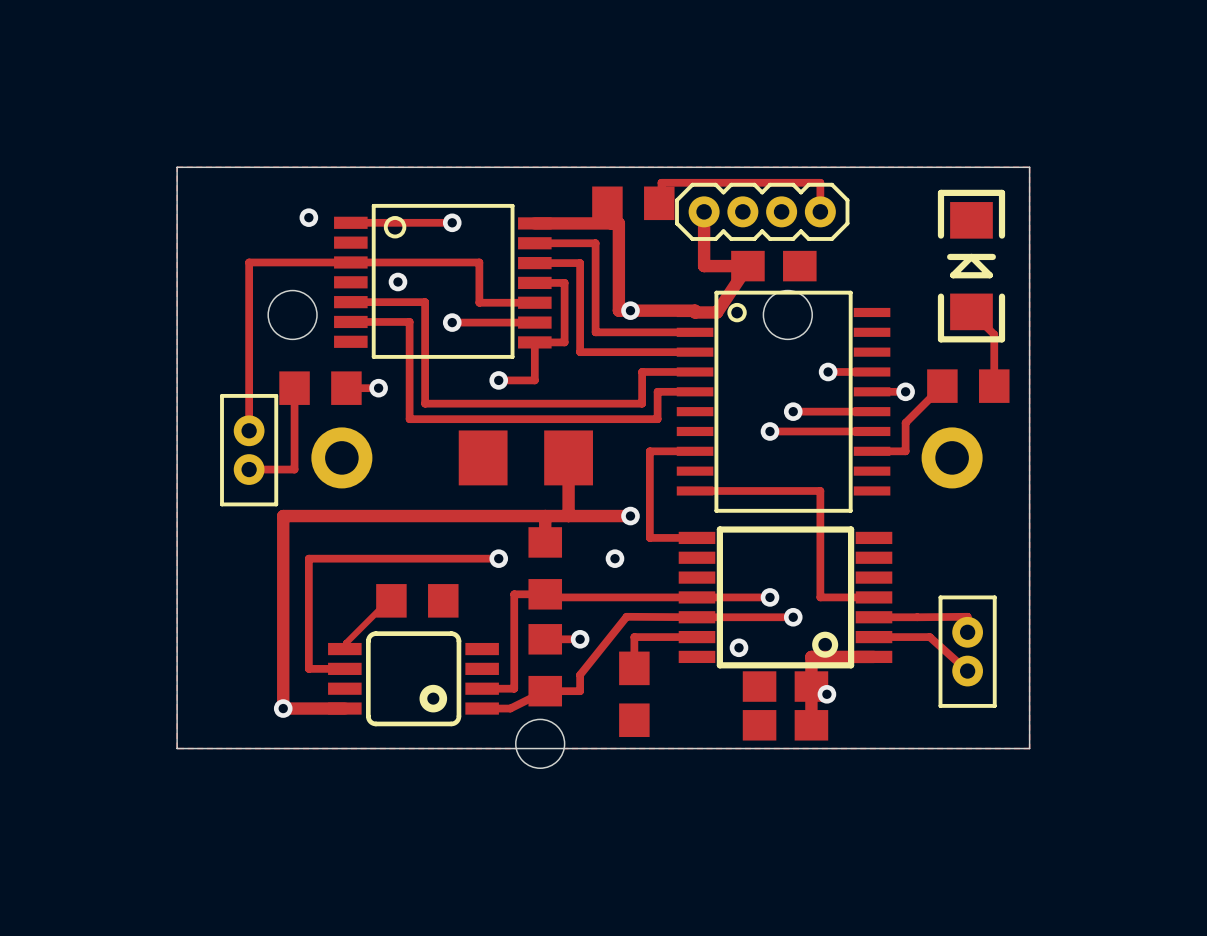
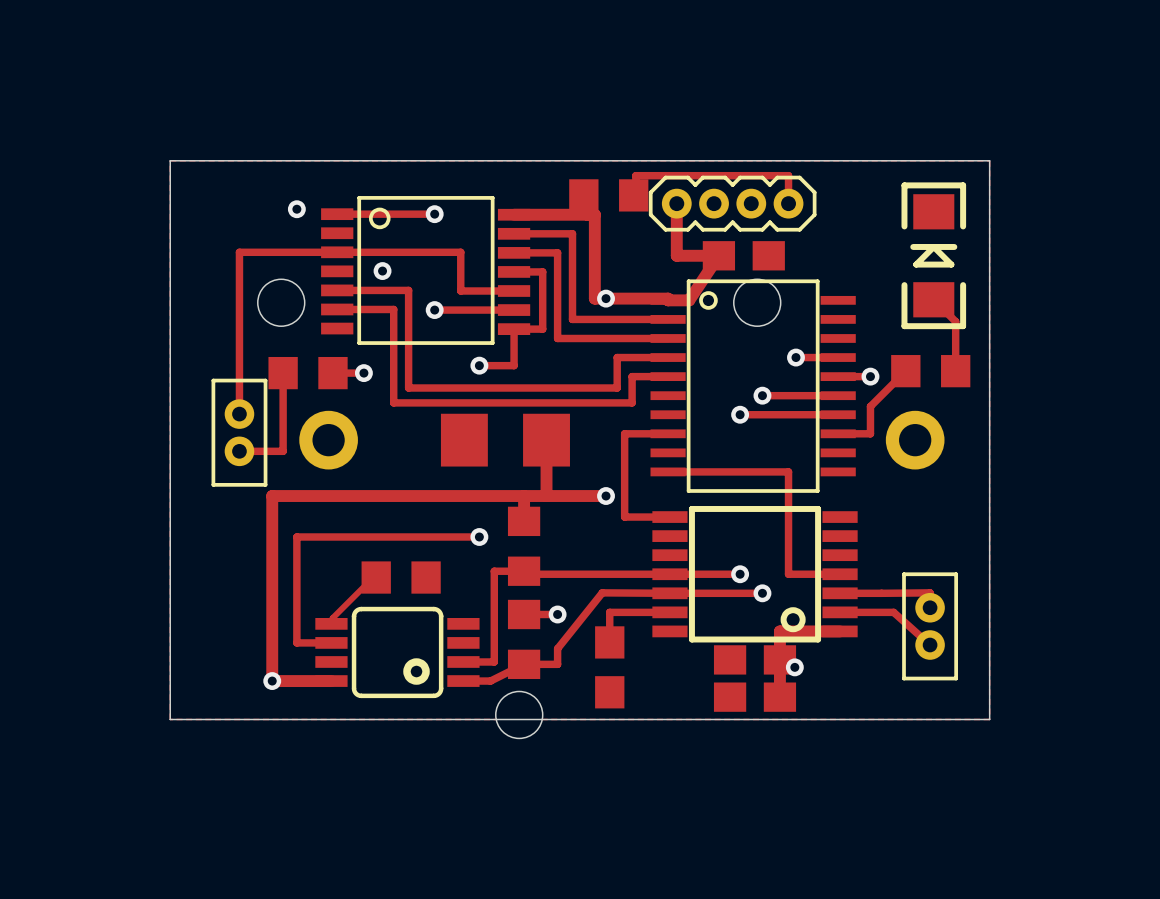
via: (614, 558) -> none
via: (738, 647) -> none

